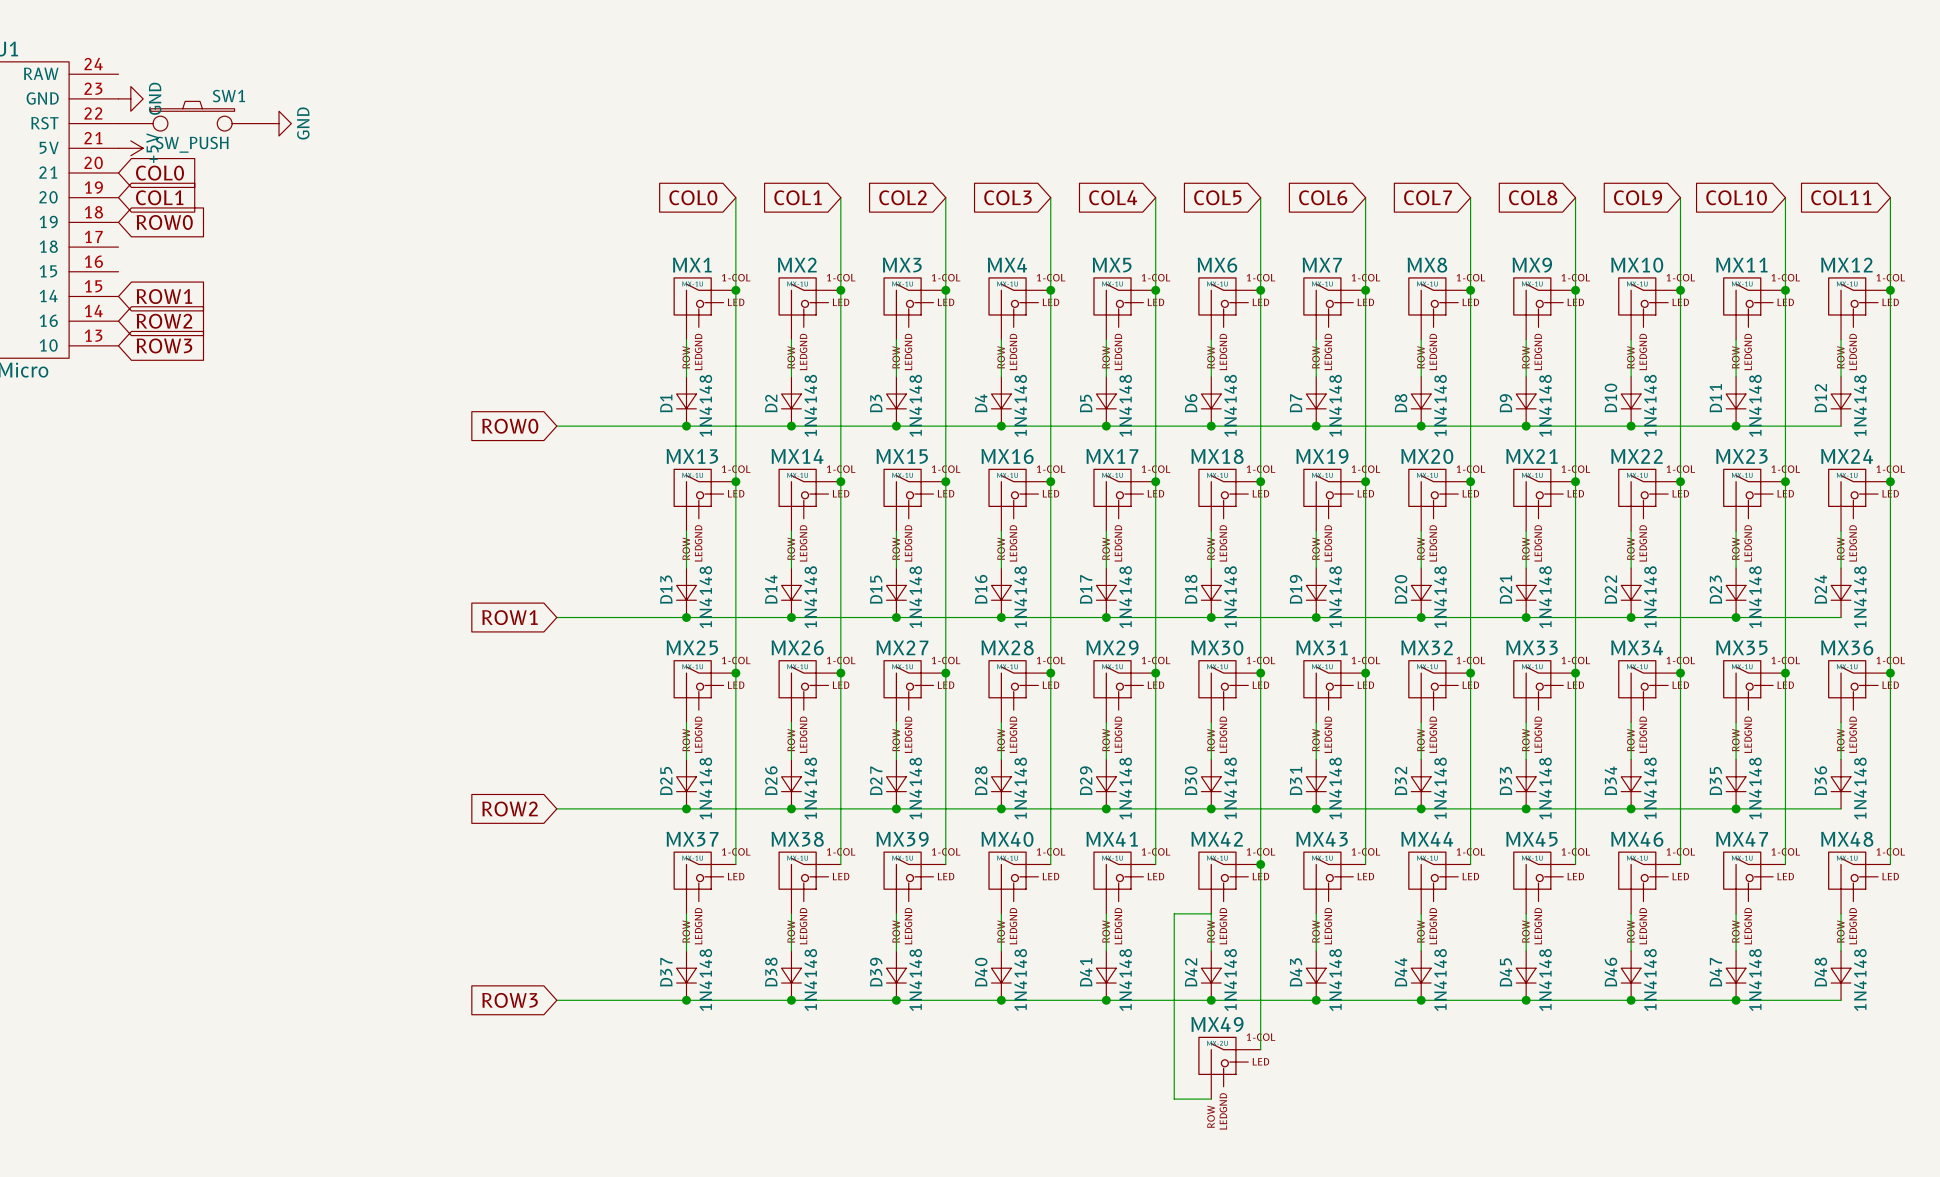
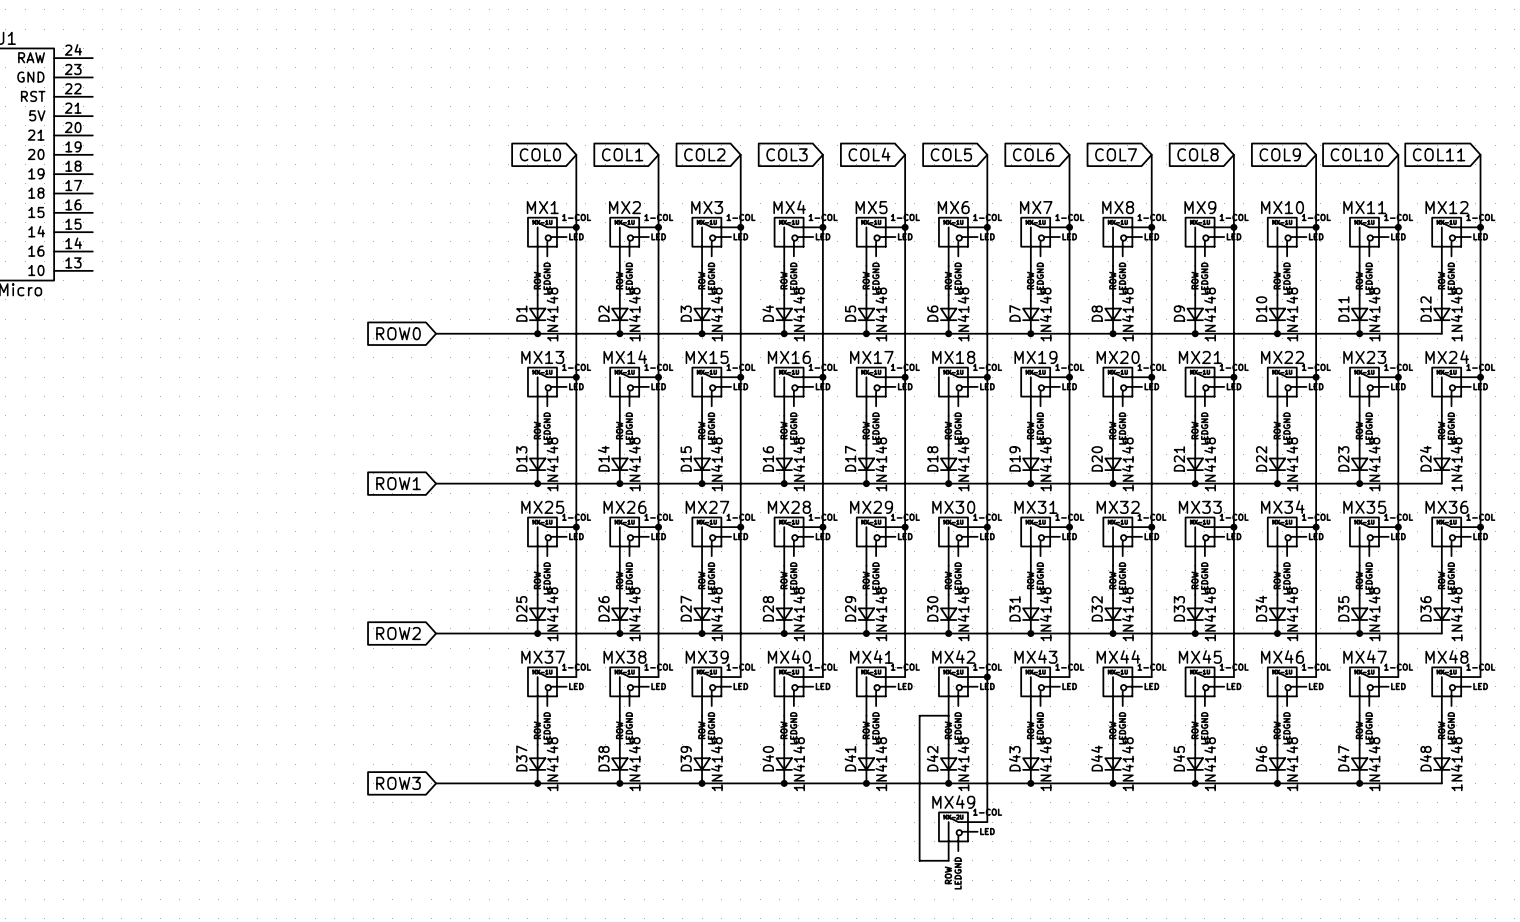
power symbol: GND (130, 98) -> none
SW1: SW_PUSH (192, 116) -> none
power symbol: GND (279, 123) -> none
power symbol: +5V (130, 148) -> none
global label: COL0 (160, 173) -> none
global label: COL1 (159, 197) -> none
global label: ROW0 (164, 222) -> none
global label: ROW1 (164, 296) -> none
global label: ROW2 (164, 321) -> none
global label: ROW3 (164, 345) -> none

